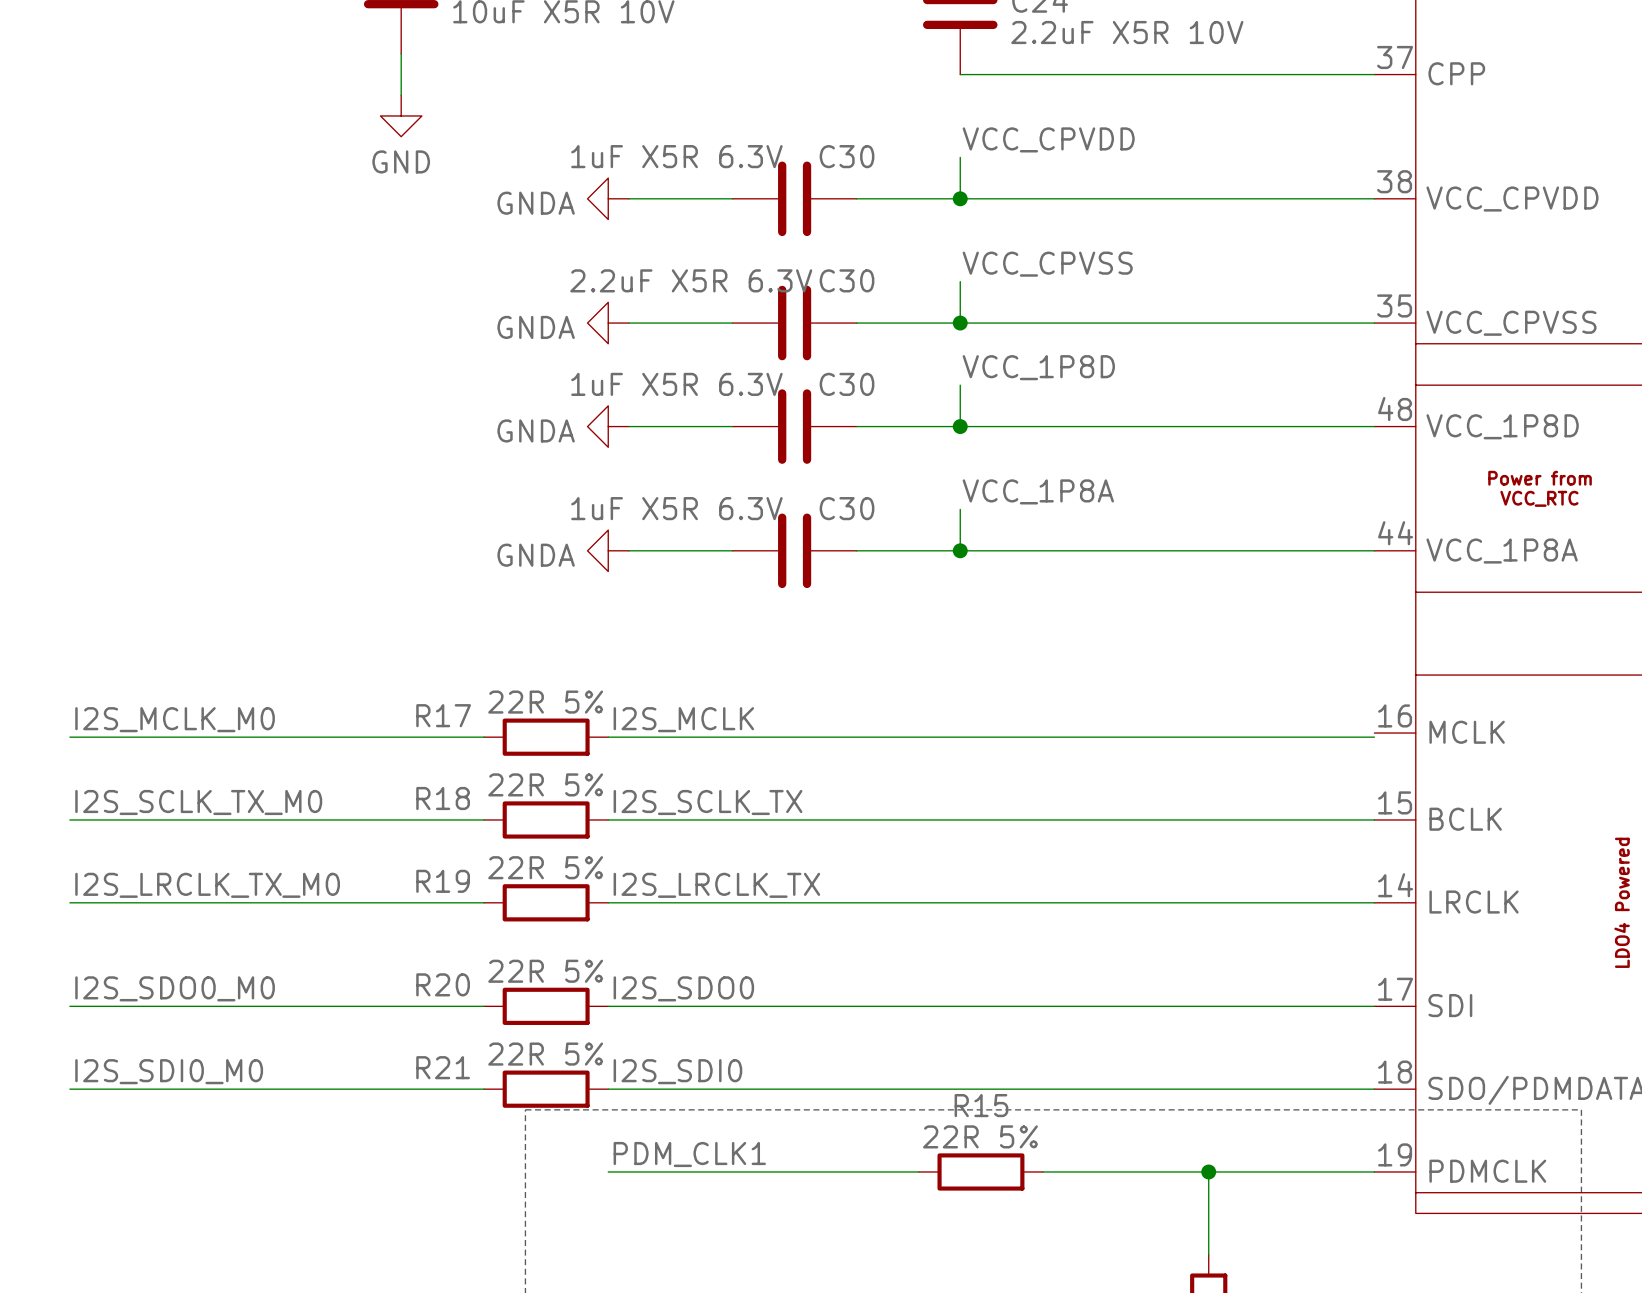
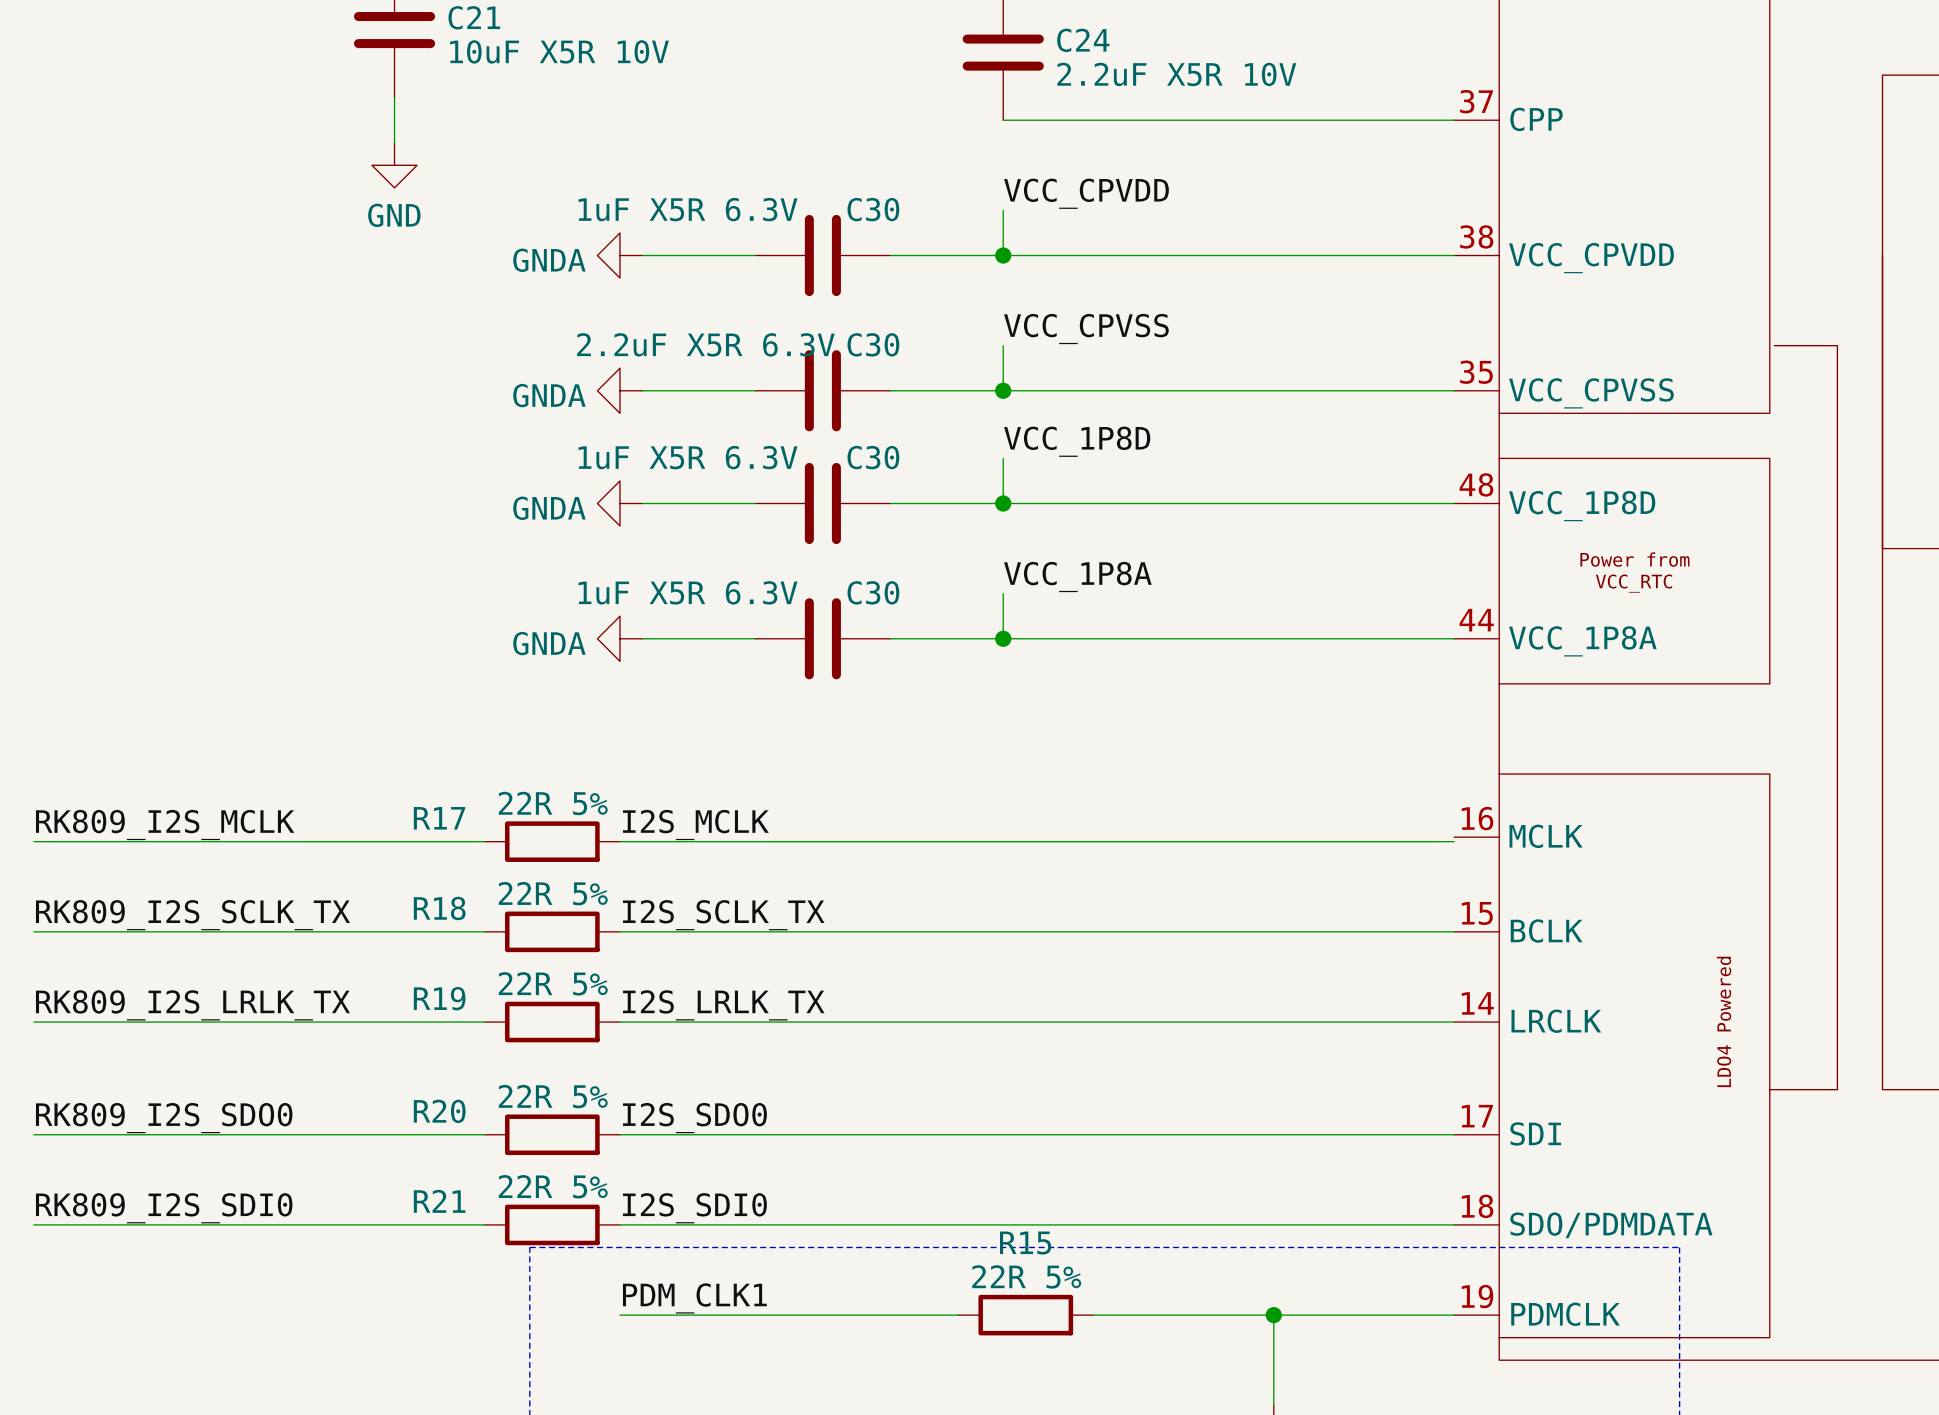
label: I2S_MCLK_M0 (175, 719) -> RK809_I2S_MCLK (165, 824)
label: I2S_SCLK_TX_M0 (198, 802) -> RK809_I2S_SCLK_TX (192, 915)
label: I2S_LRCLK_TX_M0 (207, 885) -> RK809_I2S_LRLK_TX (192, 1005)
label: I2S_LRCLK_TX (716, 885) -> I2S_LRLK_TX (723, 1005)
label: I2S_SDO0_M0 (175, 988) -> RK809_I2S_SDO0 (164, 1118)
label: I2S_SDI0_M0 (169, 1071) -> RK809_I2S_SDI0 (164, 1208)

